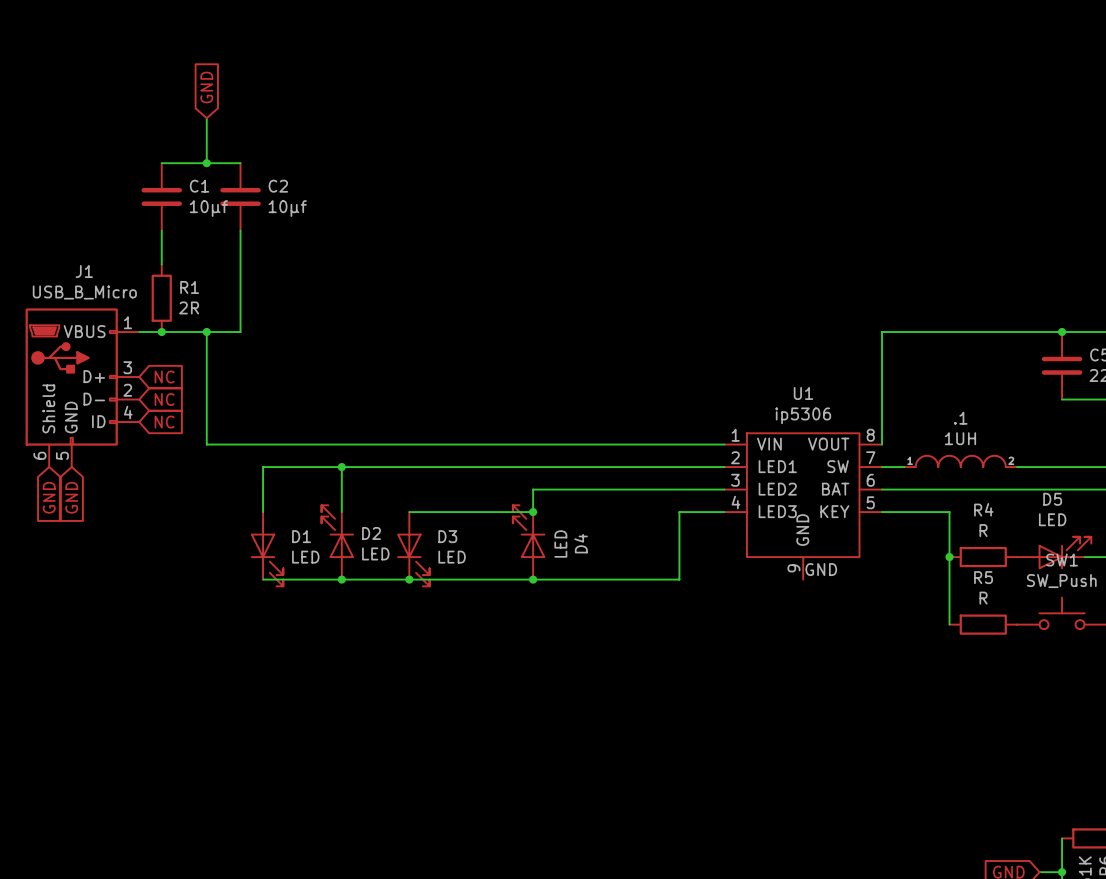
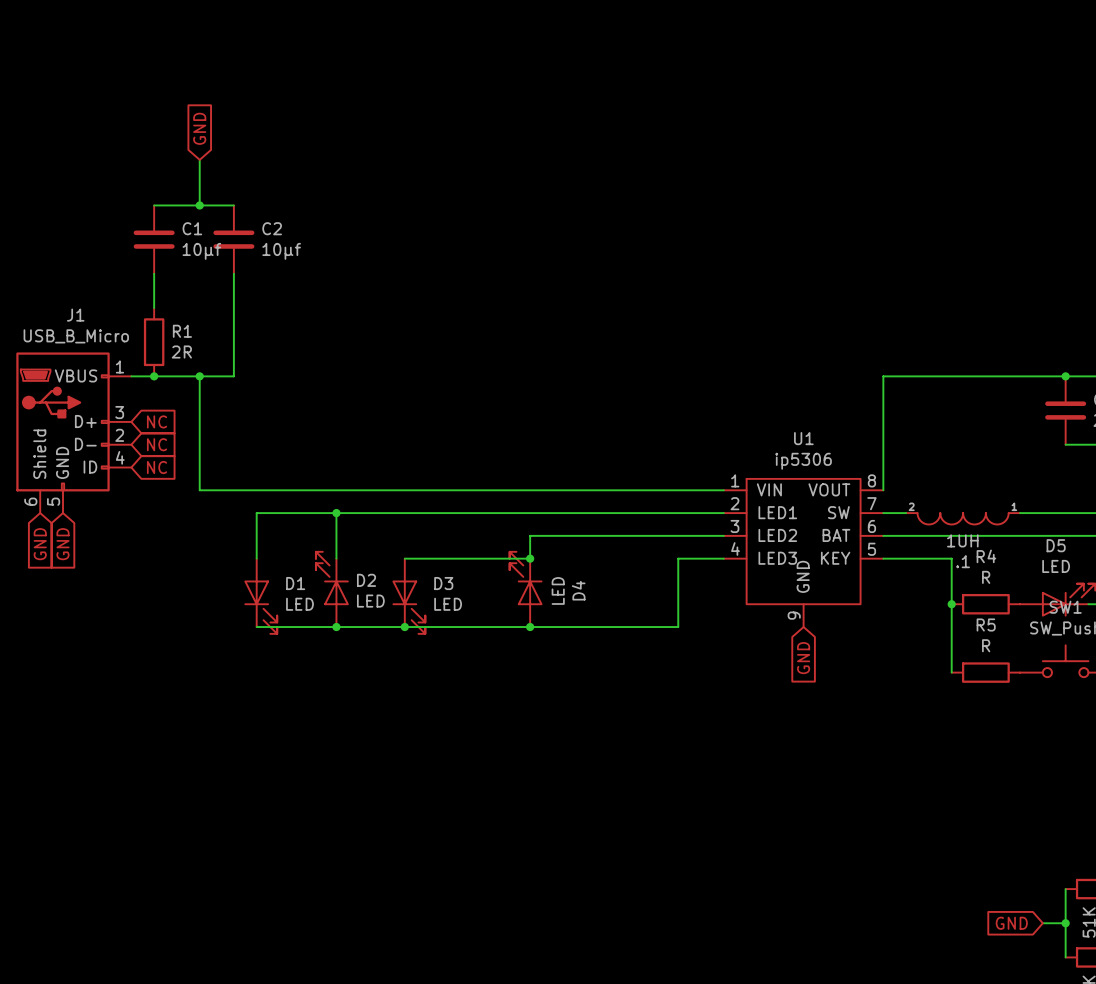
.1 rotation: 0° (960, 461) -> 180° (963, 518)
label: GND (821, 569) -> none
global label: none -> GND (803, 658)

